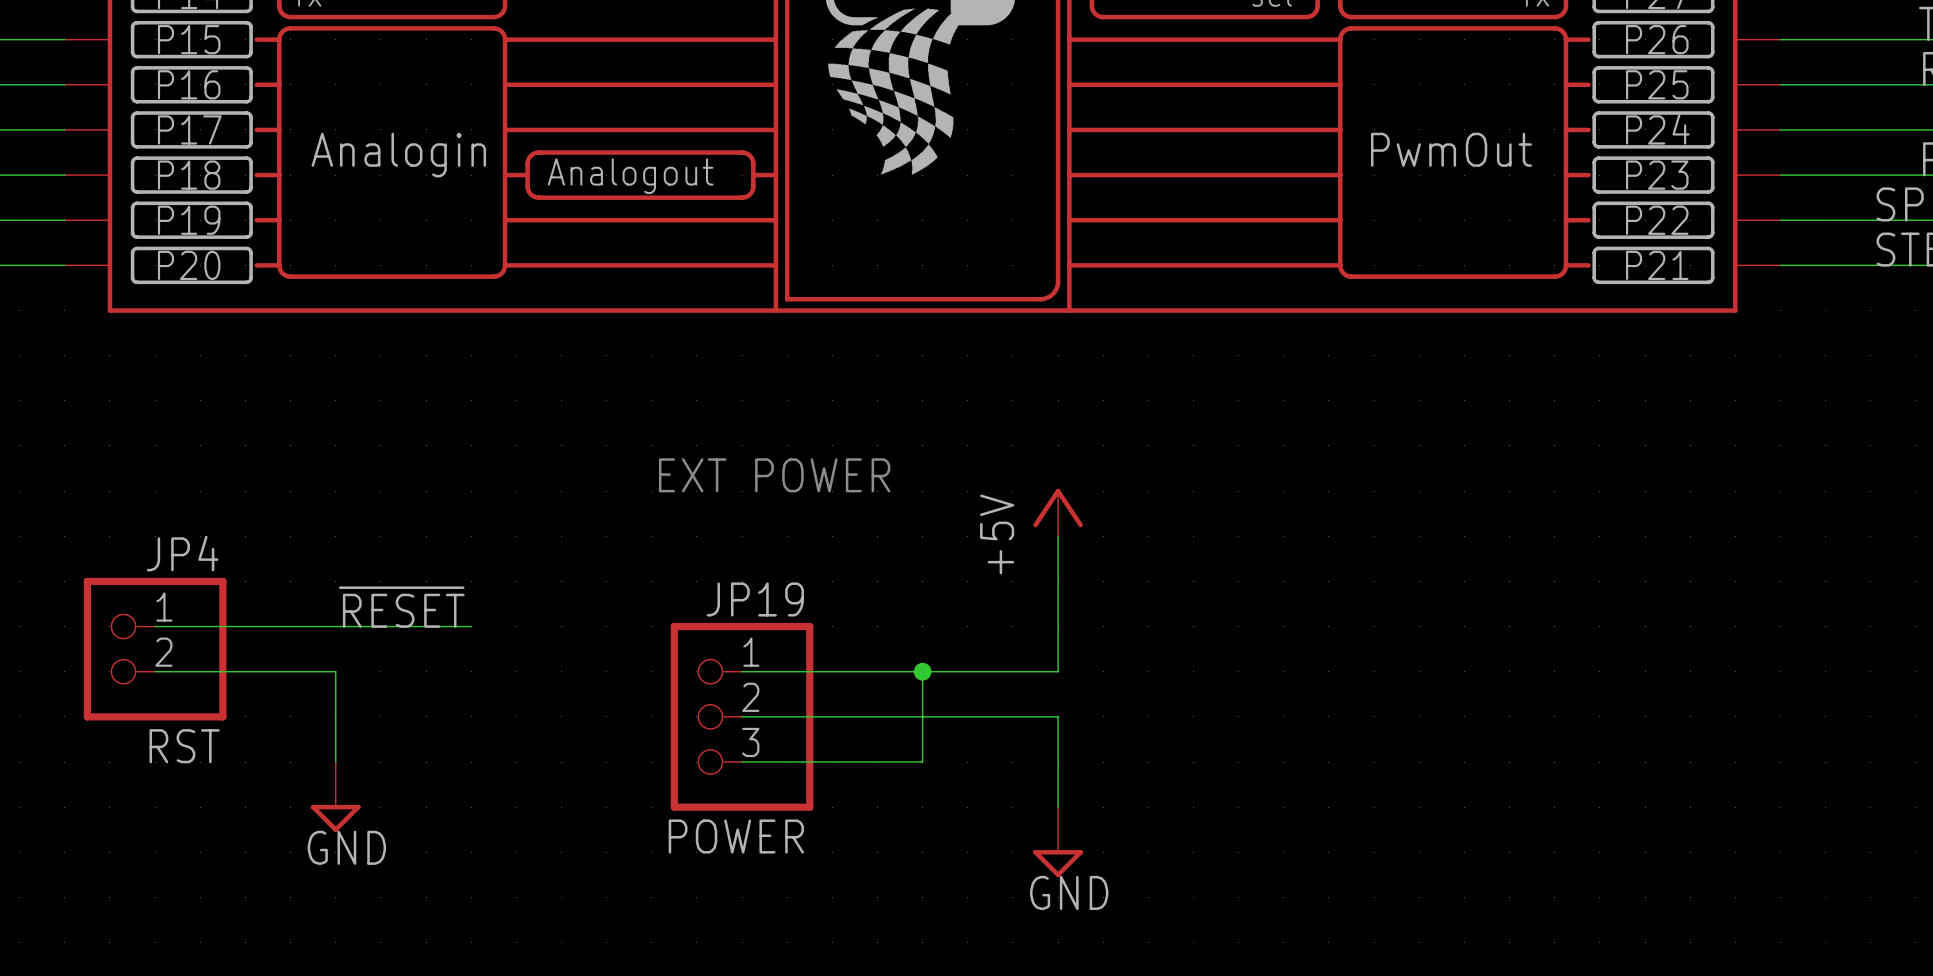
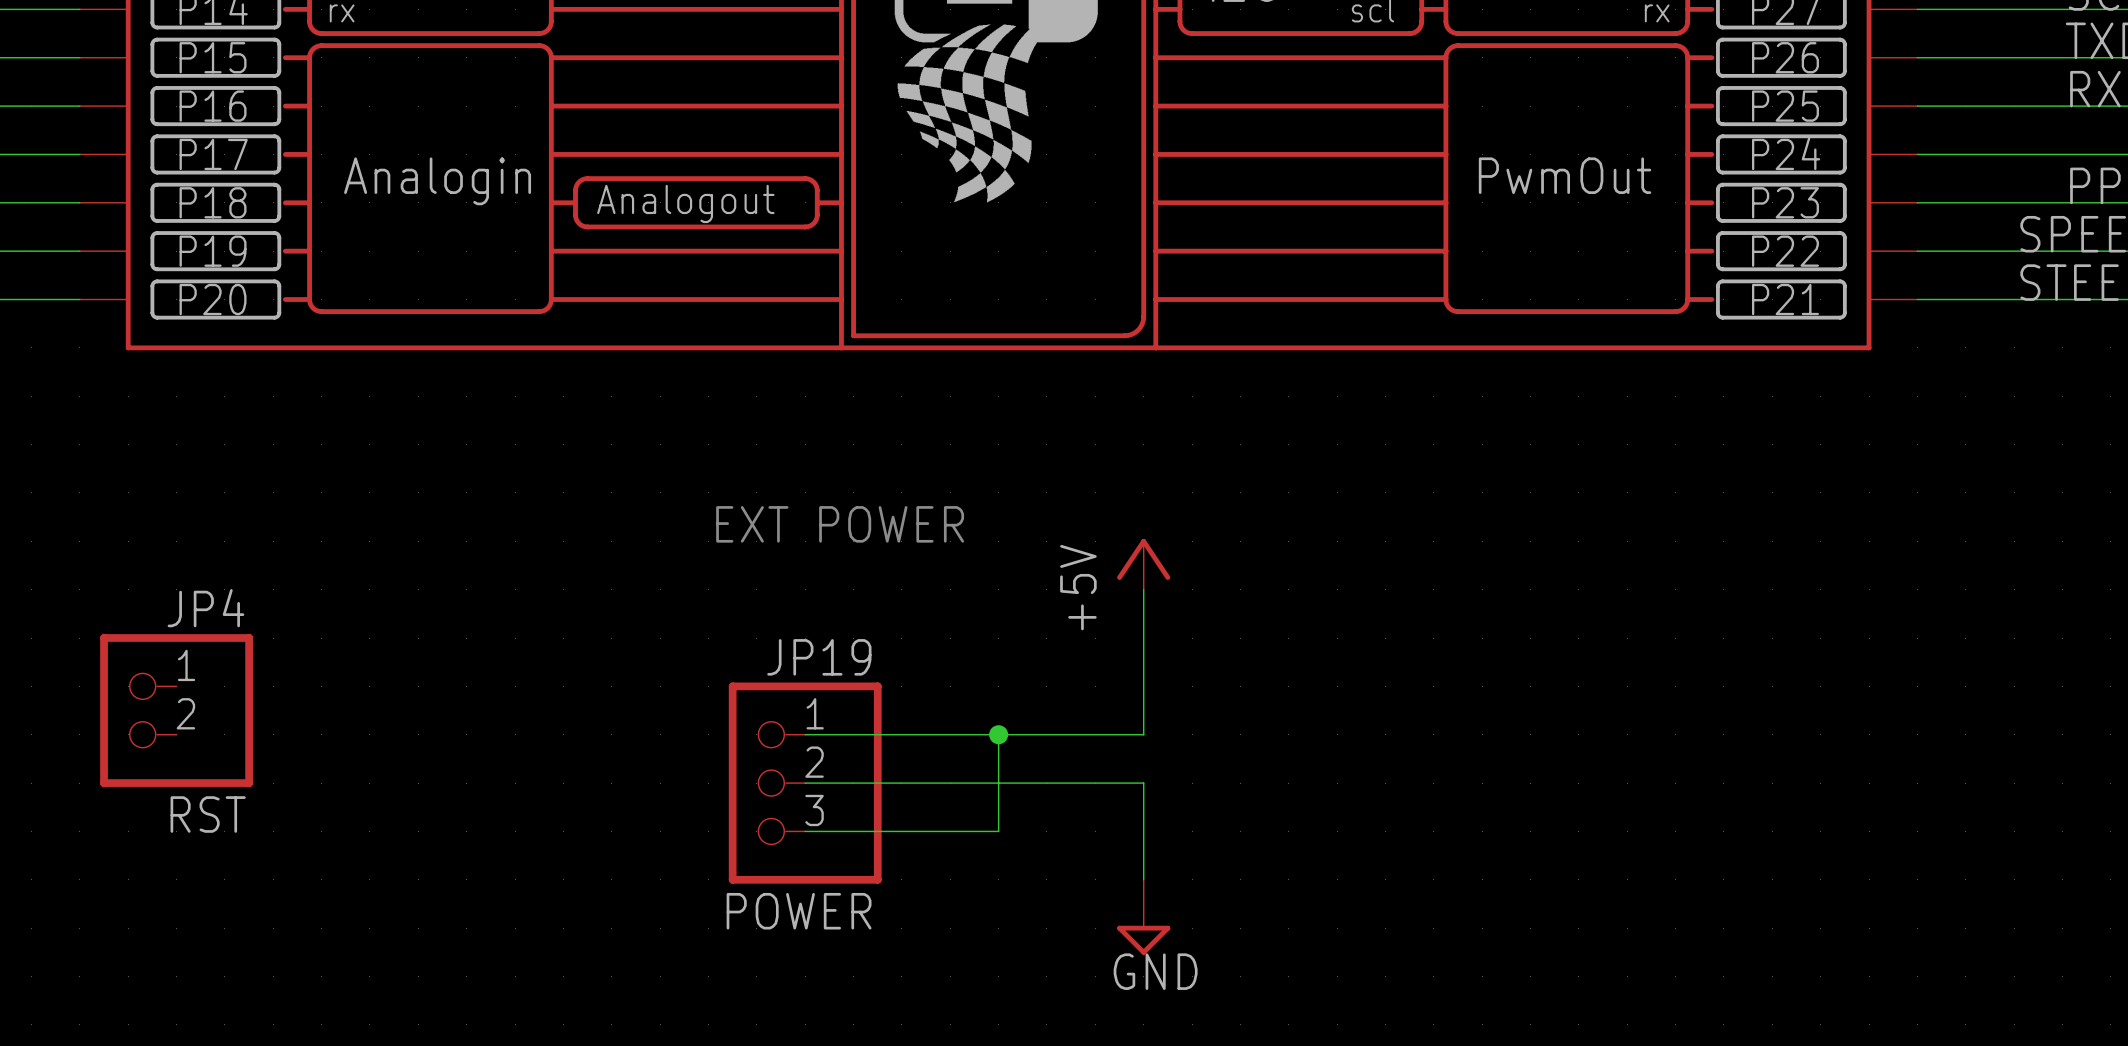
label: ~{RESET} (401, 607) -> none
wire: (155, 626) (471, 626) -> none
wire: (155, 671) (335, 671) (335, 762) -> none
power symbol: GND (335, 796) -> none

